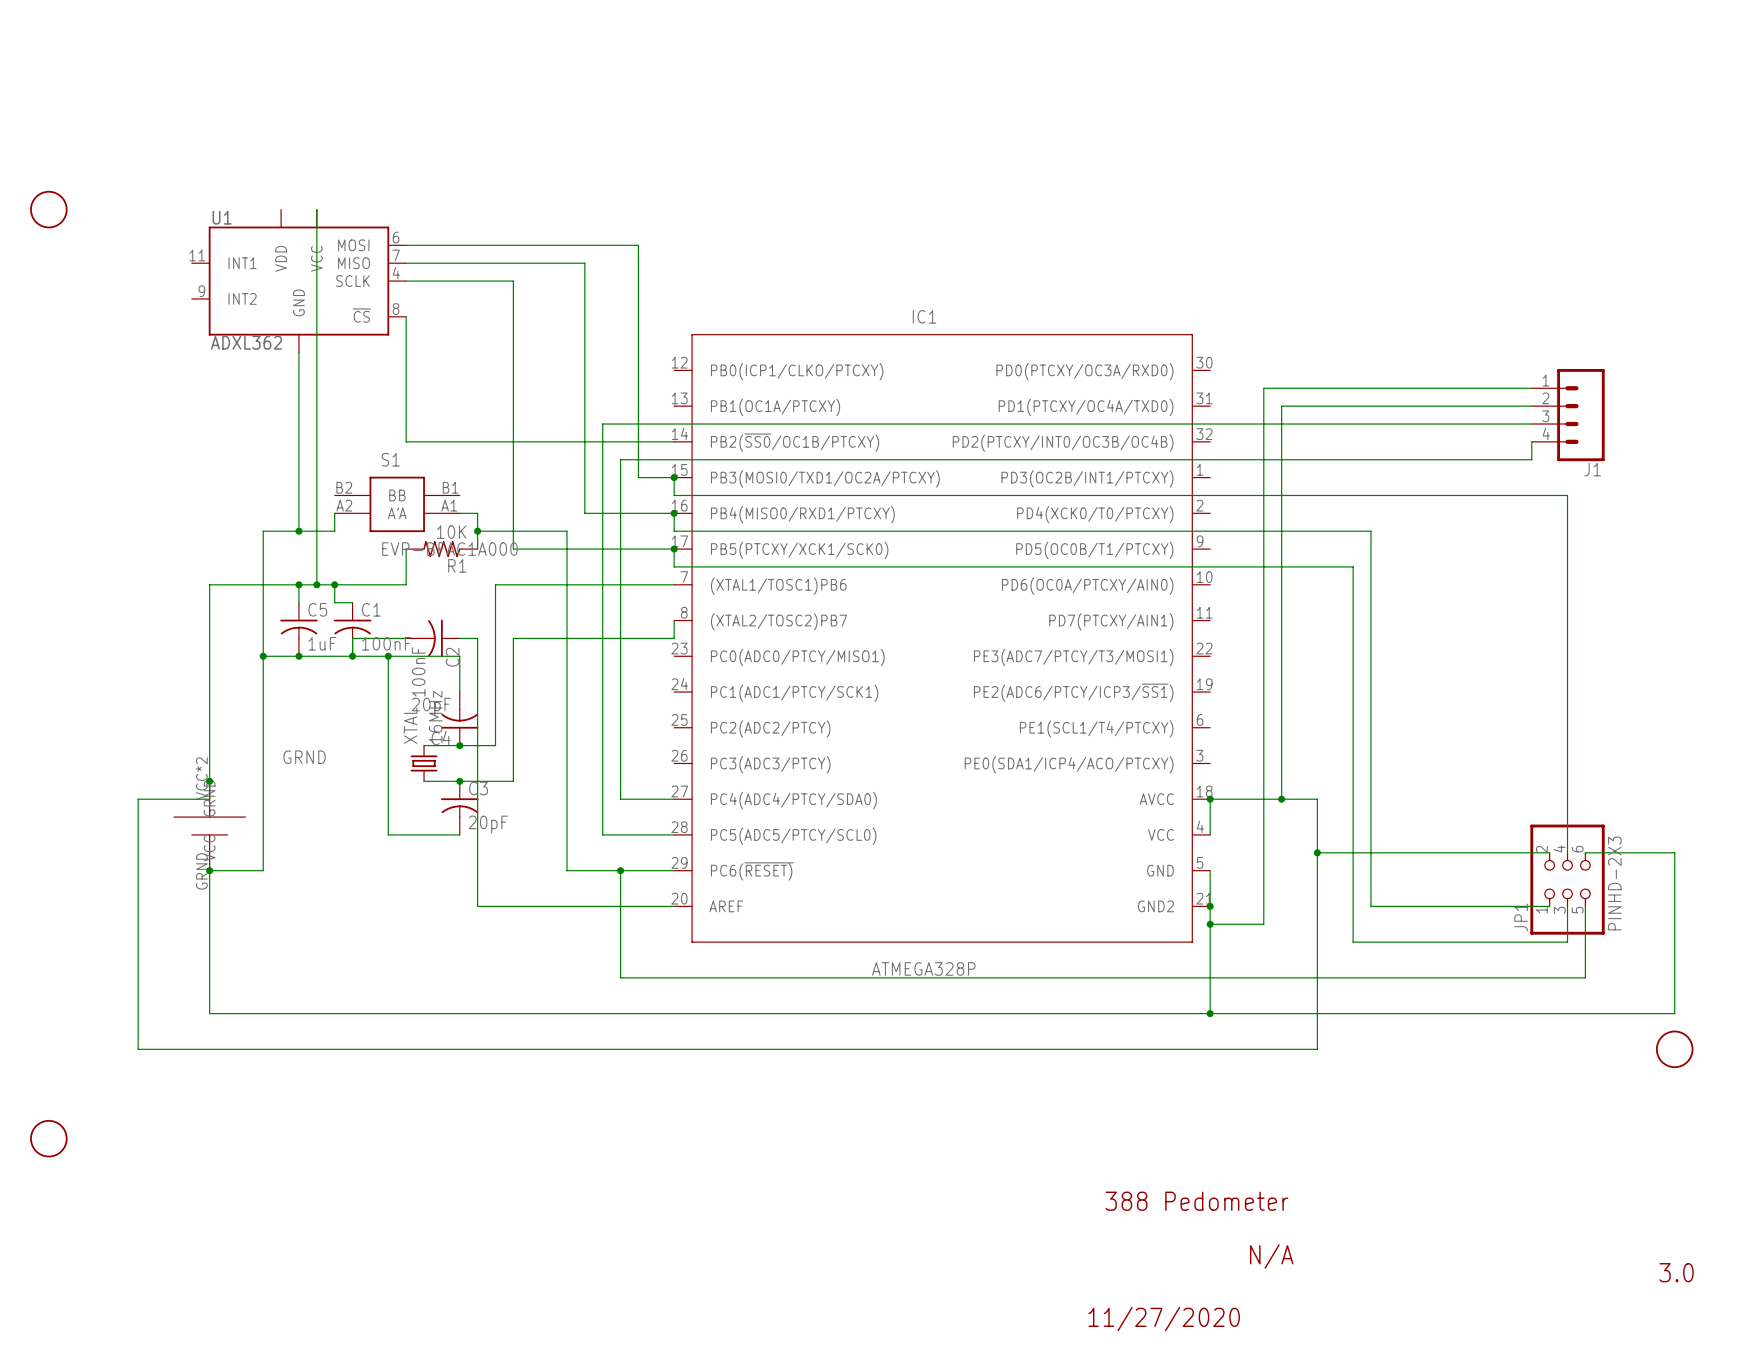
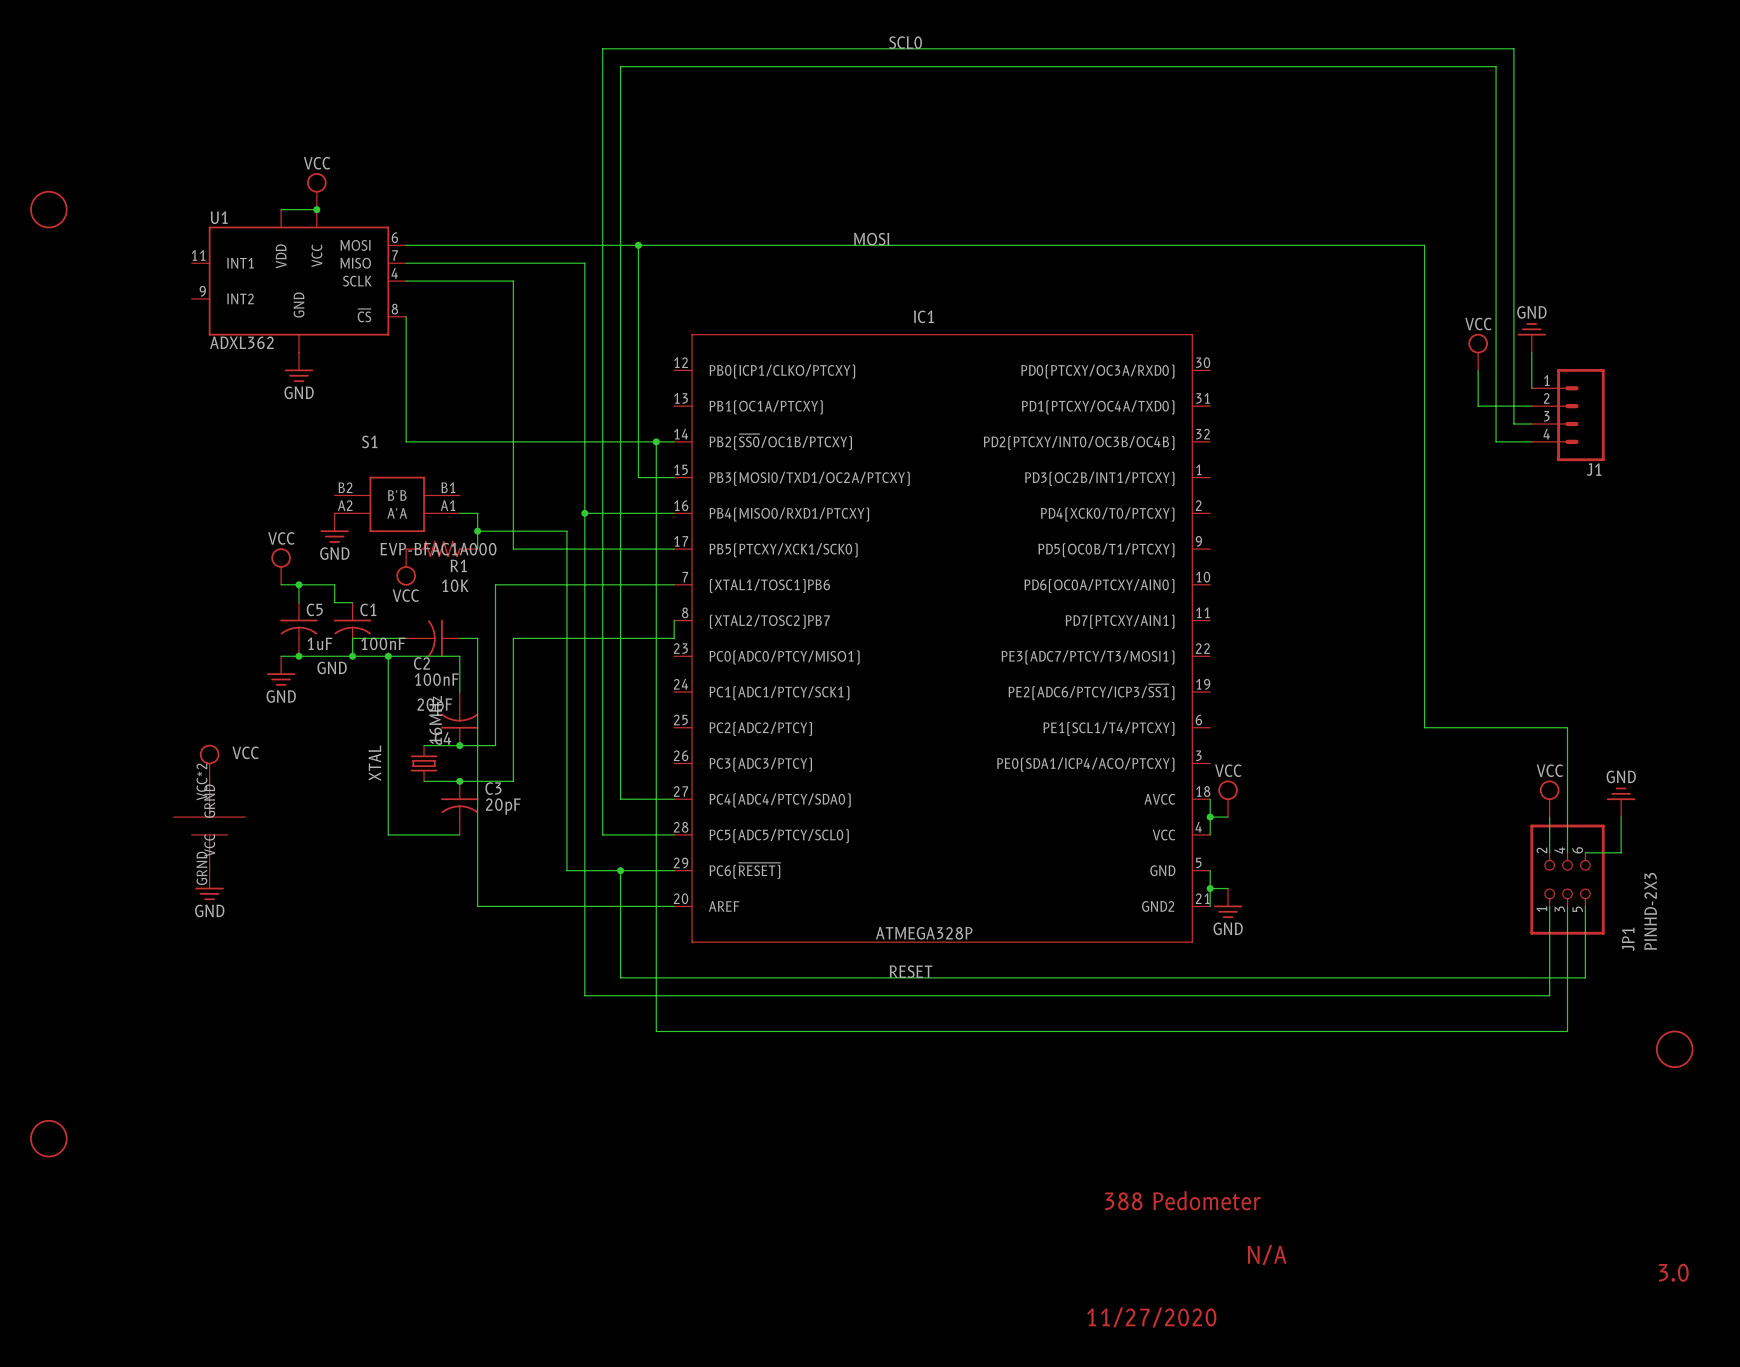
label: none -> SCL0 (905, 42)
power symbol: none -> VCC (316, 191)
wire: (316, 209) (316, 584) -> (316, 209) (281, 209)
junction: none -> (316, 209)
label: none -> MOSI (871, 239)
junction: none -> (638, 245)
power symbol: none -> GND (1531, 337)
wire: (298, 352) (298, 531) -> none
power symbol: none -> VCC (1478, 352)
power symbol: none -> GND (298, 367)
wire: (1531, 388) (1263, 388) (1263, 924) (1210, 924) -> (1531, 388) (1531, 352)
wire: (1478, 406) (1281, 406) (1281, 799) -> (1478, 406) (1478, 370)
wire: (602, 424) (1513, 424) -> (602, 424) (602, 48) (1513, 48) (1513, 424)
junction: none -> (656, 441)
wire: (1531, 441) (1531, 459) (620, 459) -> (1531, 441) (1496, 441) (1496, 66) (620, 66) (620, 459)
S1 name position: S1 (390, 459) -> S1 (369, 441)
wire: (674, 477) (674, 495) (1567, 495) (1567, 727) -> (638, 245) (1424, 245) (1424, 727) (1567, 727)
junction: (674, 477) -> none
wire: (334, 513) (334, 531) (263, 531) (263, 870) (209, 870) (209, 1013) (1674, 1013) (1674, 852) (1621, 852) -> (1621, 817) (1621, 852)
junction: none -> (584, 513)
wire: (674, 513) (674, 531) (1370, 531) (1370, 906) (1549, 906) -> (584, 513) (584, 995) (1549, 995) (1549, 906)
junction: (674, 513) -> none
power symbol: none -> GND (334, 528)
junction: (298, 531) -> none
R1 value position: 10K (451, 532) -> 10K (455, 585)
wire: (406, 549) (406, 584) (334, 584) -> none
wire: (674, 549) (674, 566) (1353, 566) (1353, 942) (1567, 942) -> (656, 441) (656, 1031) (1567, 1031) (1567, 942)
junction: (674, 549) -> none
power symbol: none -> VCC (281, 566)
power symbol: none -> VCC (406, 567)
wire: (281, 584) (209, 584) (209, 799) (138, 799) (138, 1049) (1317, 1049) (1317, 799) (1210, 799) -> none
junction: (316, 584) -> none
junction: (334, 584) -> none
wire: (263, 656) (281, 656) -> none
junction: (263, 656) -> none
C2 name rotation: 0° (452, 657) -> 90° clockwise (422, 663)
label: none -> GND (332, 667)
power symbol: none -> GND (281, 671)
C2 value rotation: 0° (418, 671) -> 90° clockwise (436, 679)
XTAL name position: XTAL (410, 725) -> XTAL (374, 763)
label: GRND (304, 757) -> none
power symbol: none -> VCC (209, 763)
junction: (209, 781) -> none
C3 name position: C3 (478, 788) -> C3 (493, 788)
power symbol: none -> VCC (1228, 798)
power symbol: none -> VCC (1549, 798)
junction position: (1210, 799) -> (1210, 817)
junction: (1281, 799) -> none
power symbol: none -> GND (1621, 802)
wire: none -> (1210, 817) (1228, 817)
C3 value position: 20pF (488, 824) -> 20pF (503, 806)
wire: (1317, 852) (1549, 852) -> (1549, 817) (1549, 852)
junction: (1317, 852) -> none
junction: (209, 870) -> none
JP1 value position: PINHD-2X3 (1614, 883) -> PINHD-2X3 (1650, 911)
power symbol: none -> GND (209, 885)
wire: none -> (1210, 888) (1228, 888)
junction: none -> (1210, 888)
power symbol: none -> GND (1228, 903)
wire: (1210, 906) (1210, 1013) -> none
junction: (1210, 906) -> none
JP1 name position: JP1 (1521, 917) -> JP1 (1628, 939)
junction: (1210, 924) -> none
IC1 value position: ATMEGA328P (923, 968) -> ATMEGA328P (924, 933)
label: none -> RESET (911, 971)
junction: (1210, 1013) -> none

